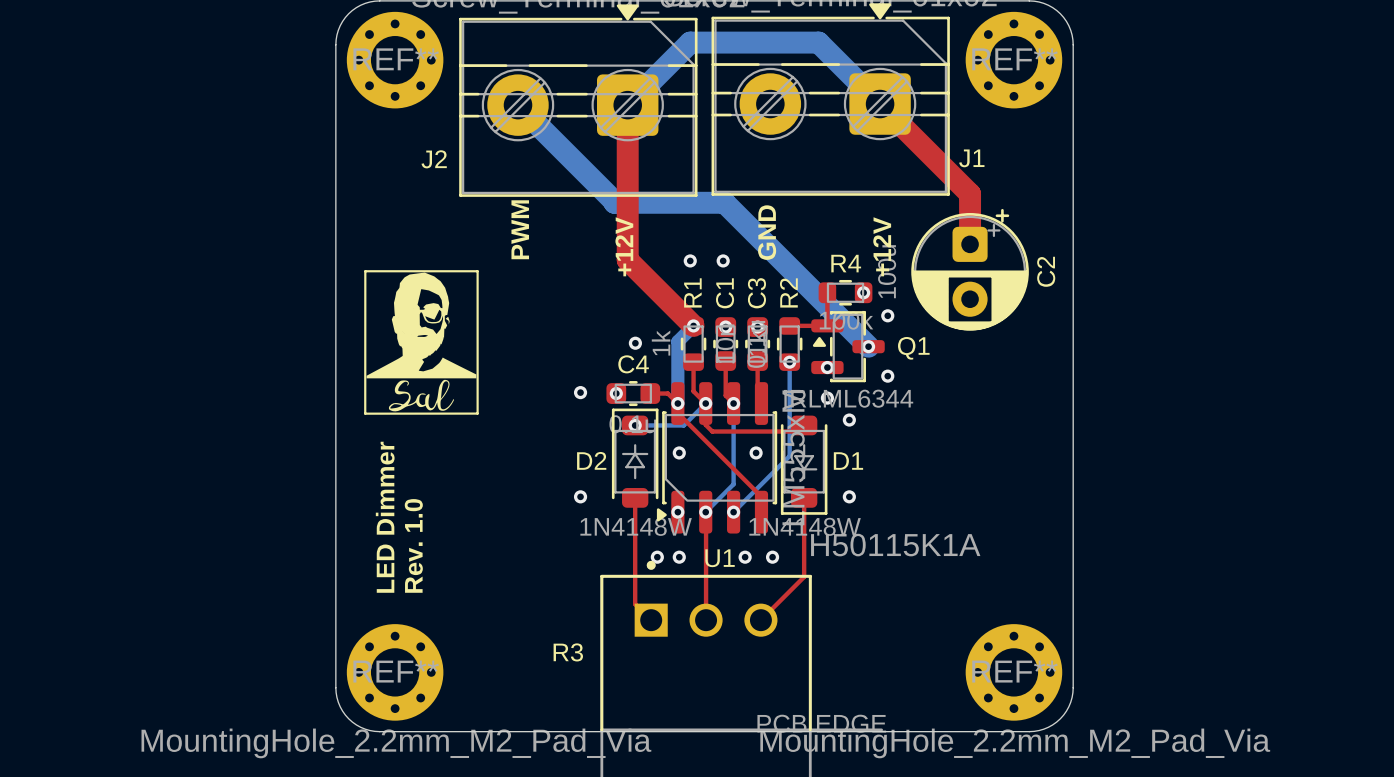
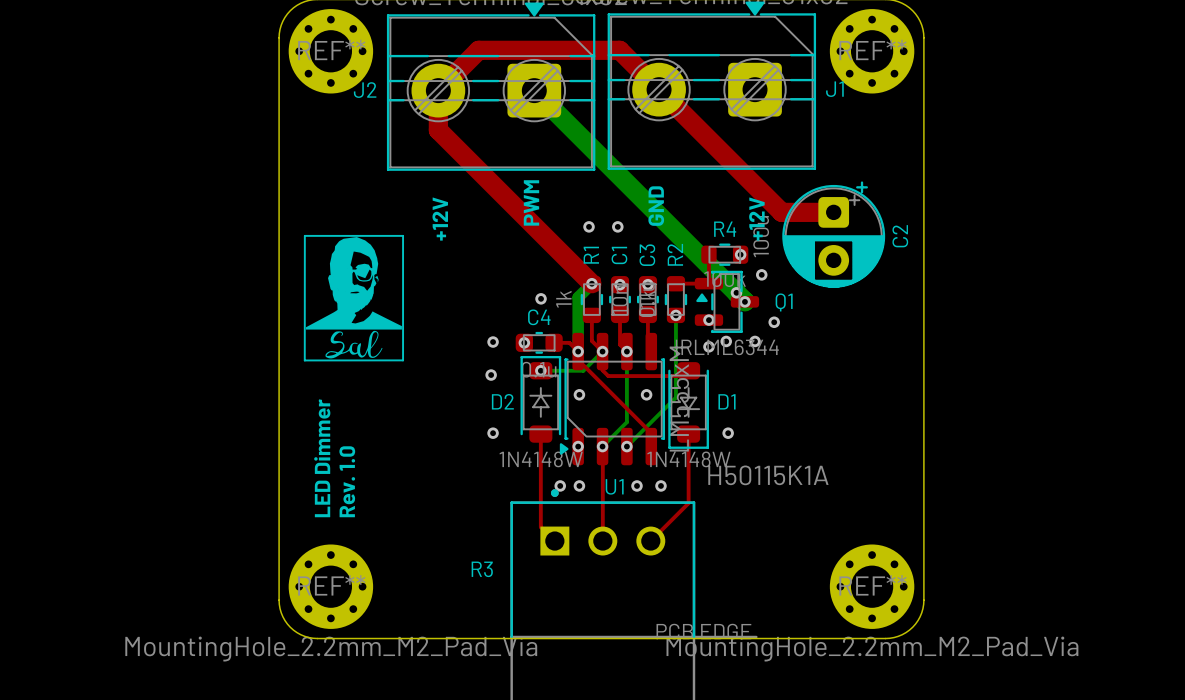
top track: (880, 104) (970, 194) (970, 244) -> (534, 226) (438, 130) (438, 90) (478, 50) (619, 50) (781, 212) (833, 212)
bottom track: (880, 104) (818, 42) (690, 42) (627, 105) -> none
bottom track: (518, 105) (614, 202) (724, 202) (868, 346) -> (534, 90) (744, 301)
top track: (627, 105) (627, 260) -> none
J1 name position: J1 (971, 158) -> J1 (834, 89)
J2 name position: J2 (434, 159) -> J2 (365, 90)
text position: PWM (520, 229) -> PWM (531, 202)
text position: +12V (624, 246) -> +12V (440, 219)
via: none -> (736, 292)
via: none -> (774, 322)
via: (887, 376) -> none
via: none -> (726, 341)
via: none -> (755, 341)
via: (849, 420) -> none
via: none -> (491, 375)

